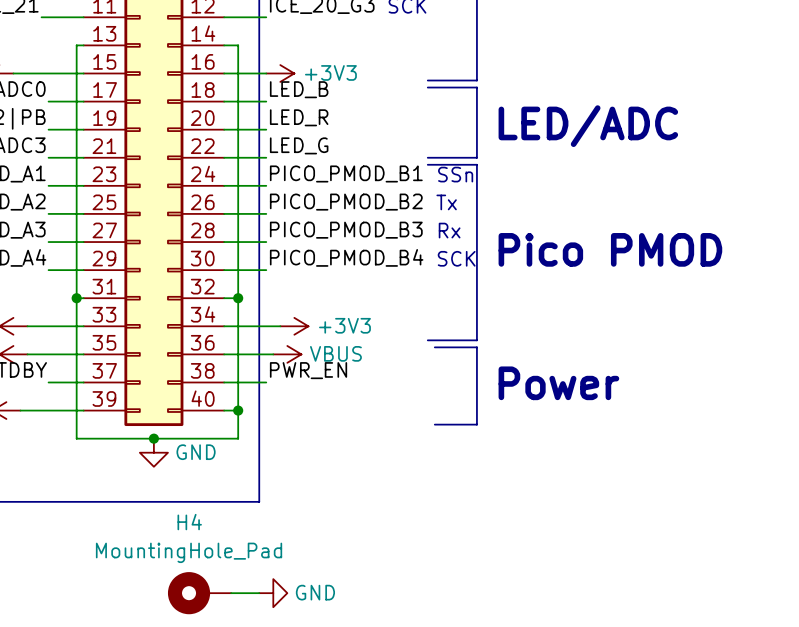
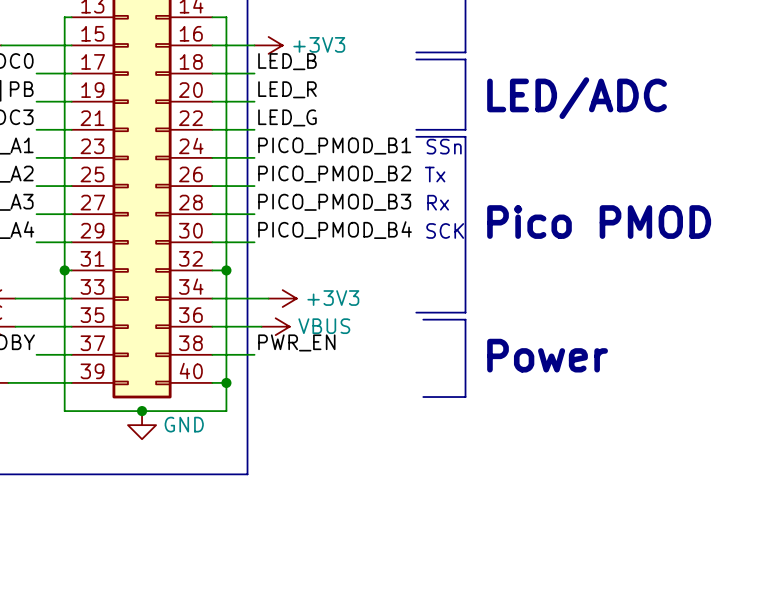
H4: MountingHole_Pad (199, 593) -> none
wire: (231, 593) (259, 593) -> none
power symbol: GND (273, 593) -> none

